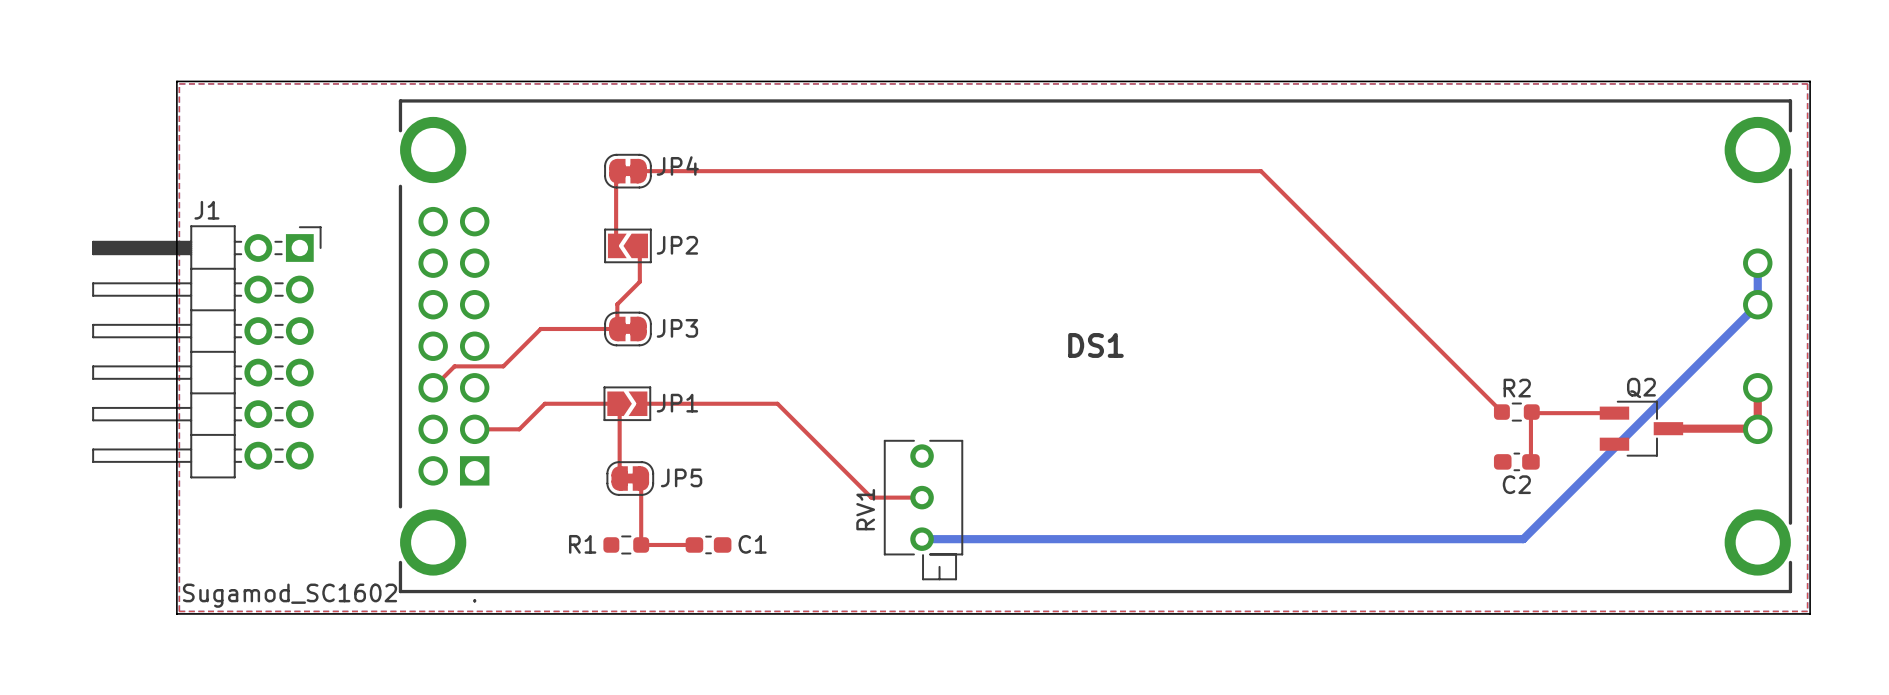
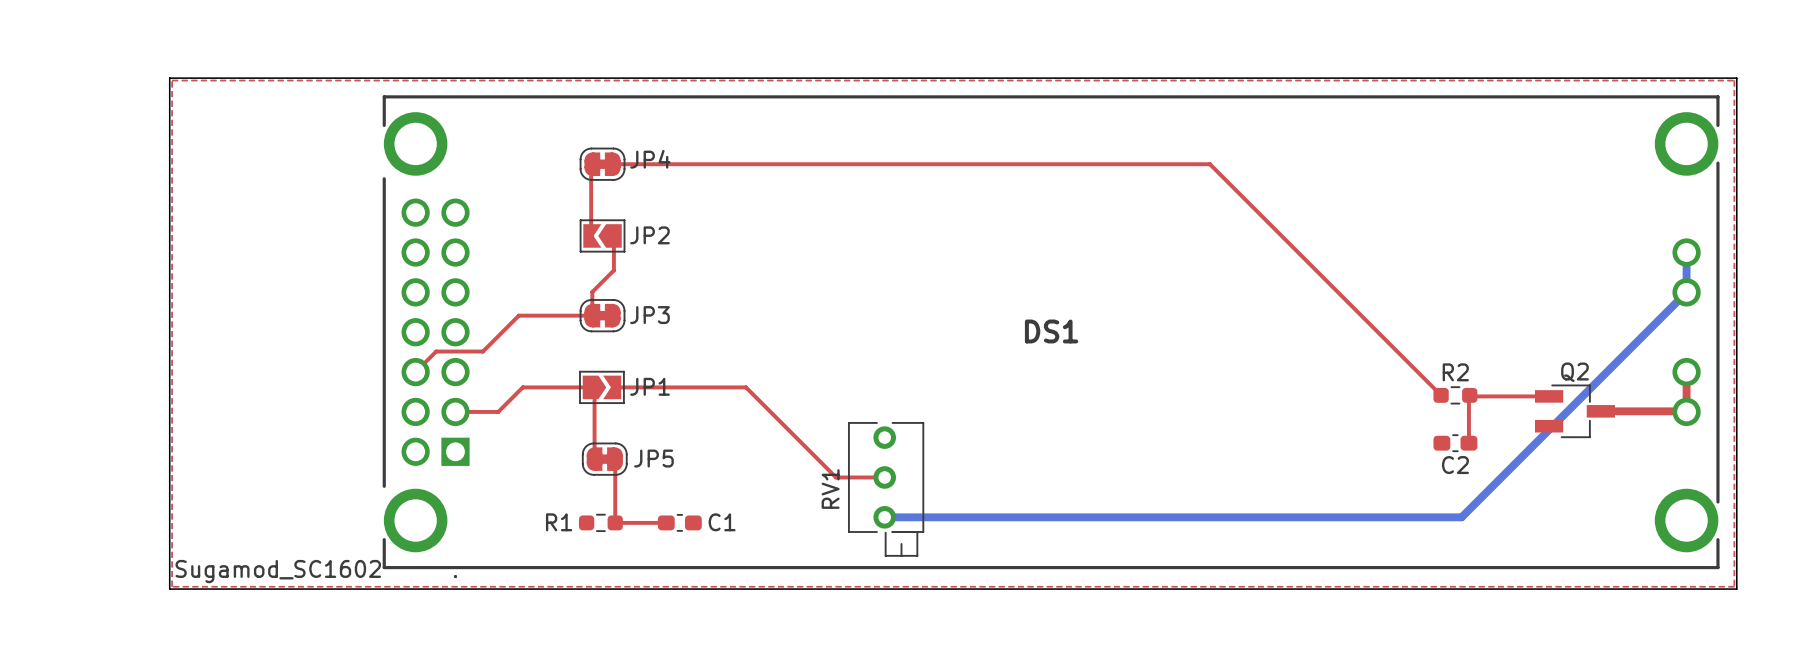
J1: (206, 351) -> none

